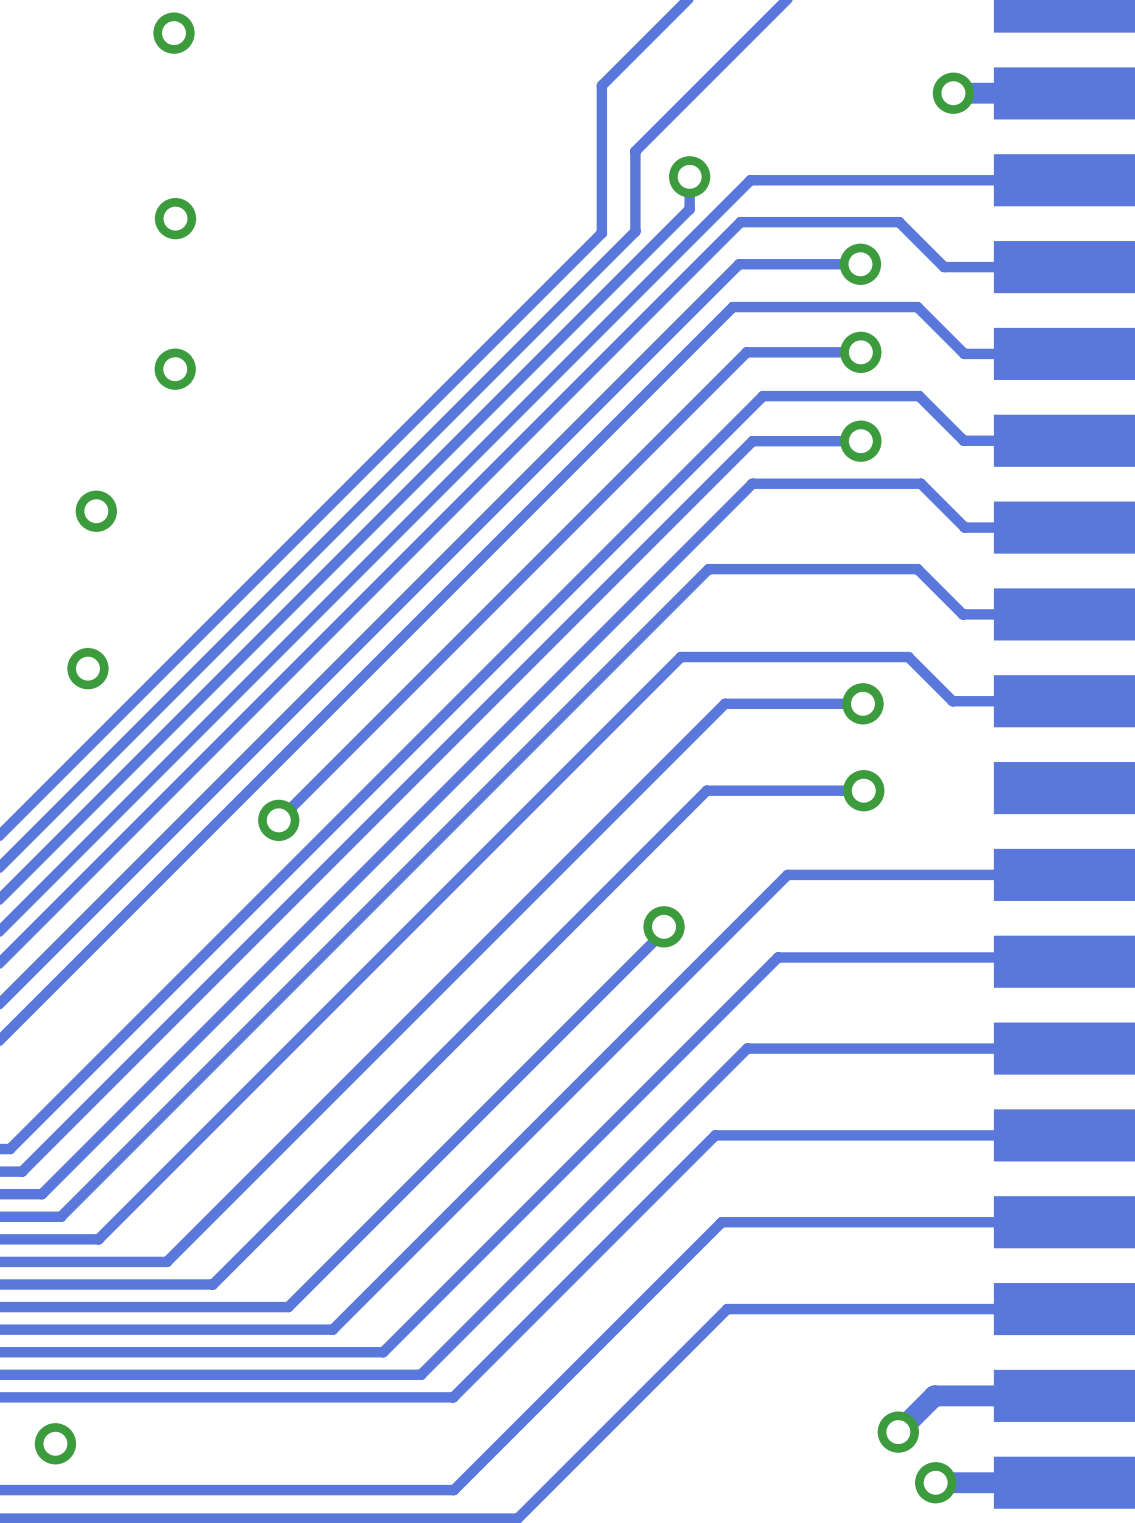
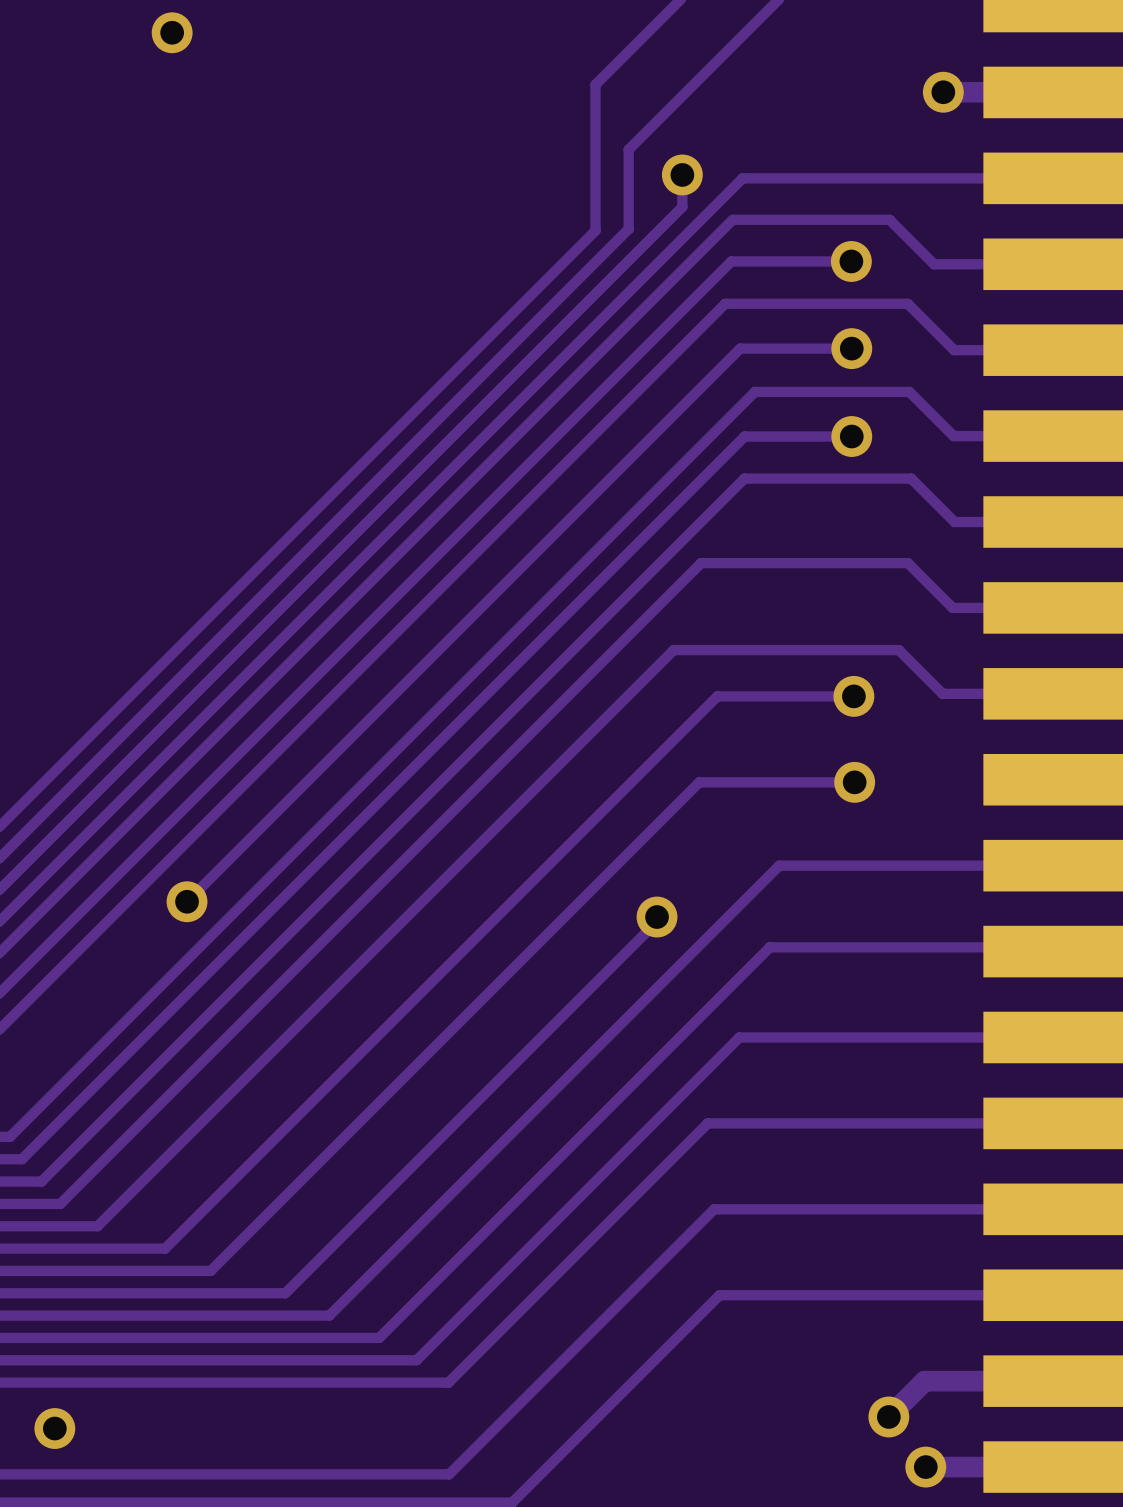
via: (175, 218) -> none
track: (746, 352) (278, 820) -> (740, 348) (187, 901)
via: (175, 369) -> none
via: (96, 511) -> none
via: (87, 668) -> none
via position: (278, 820) -> (187, 901)

